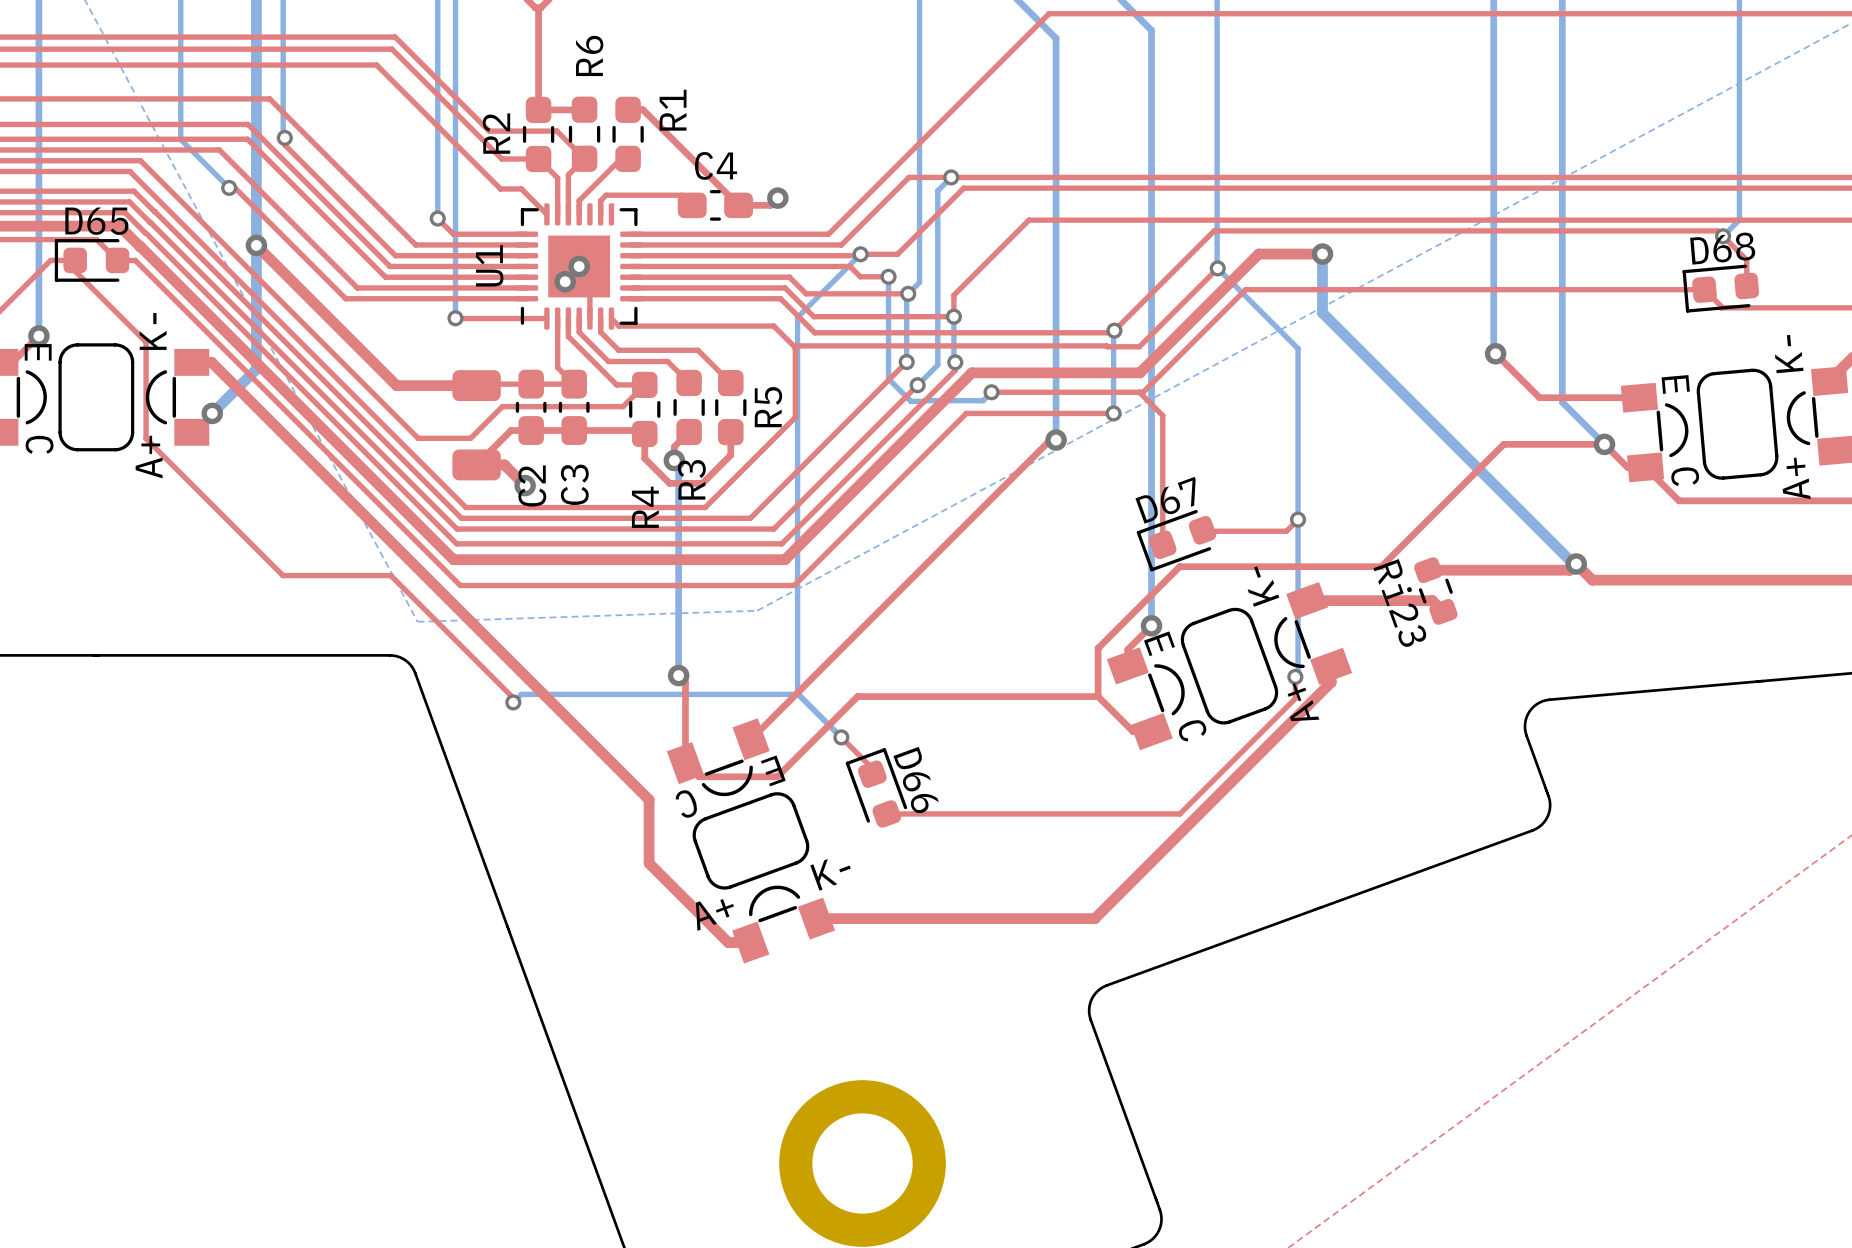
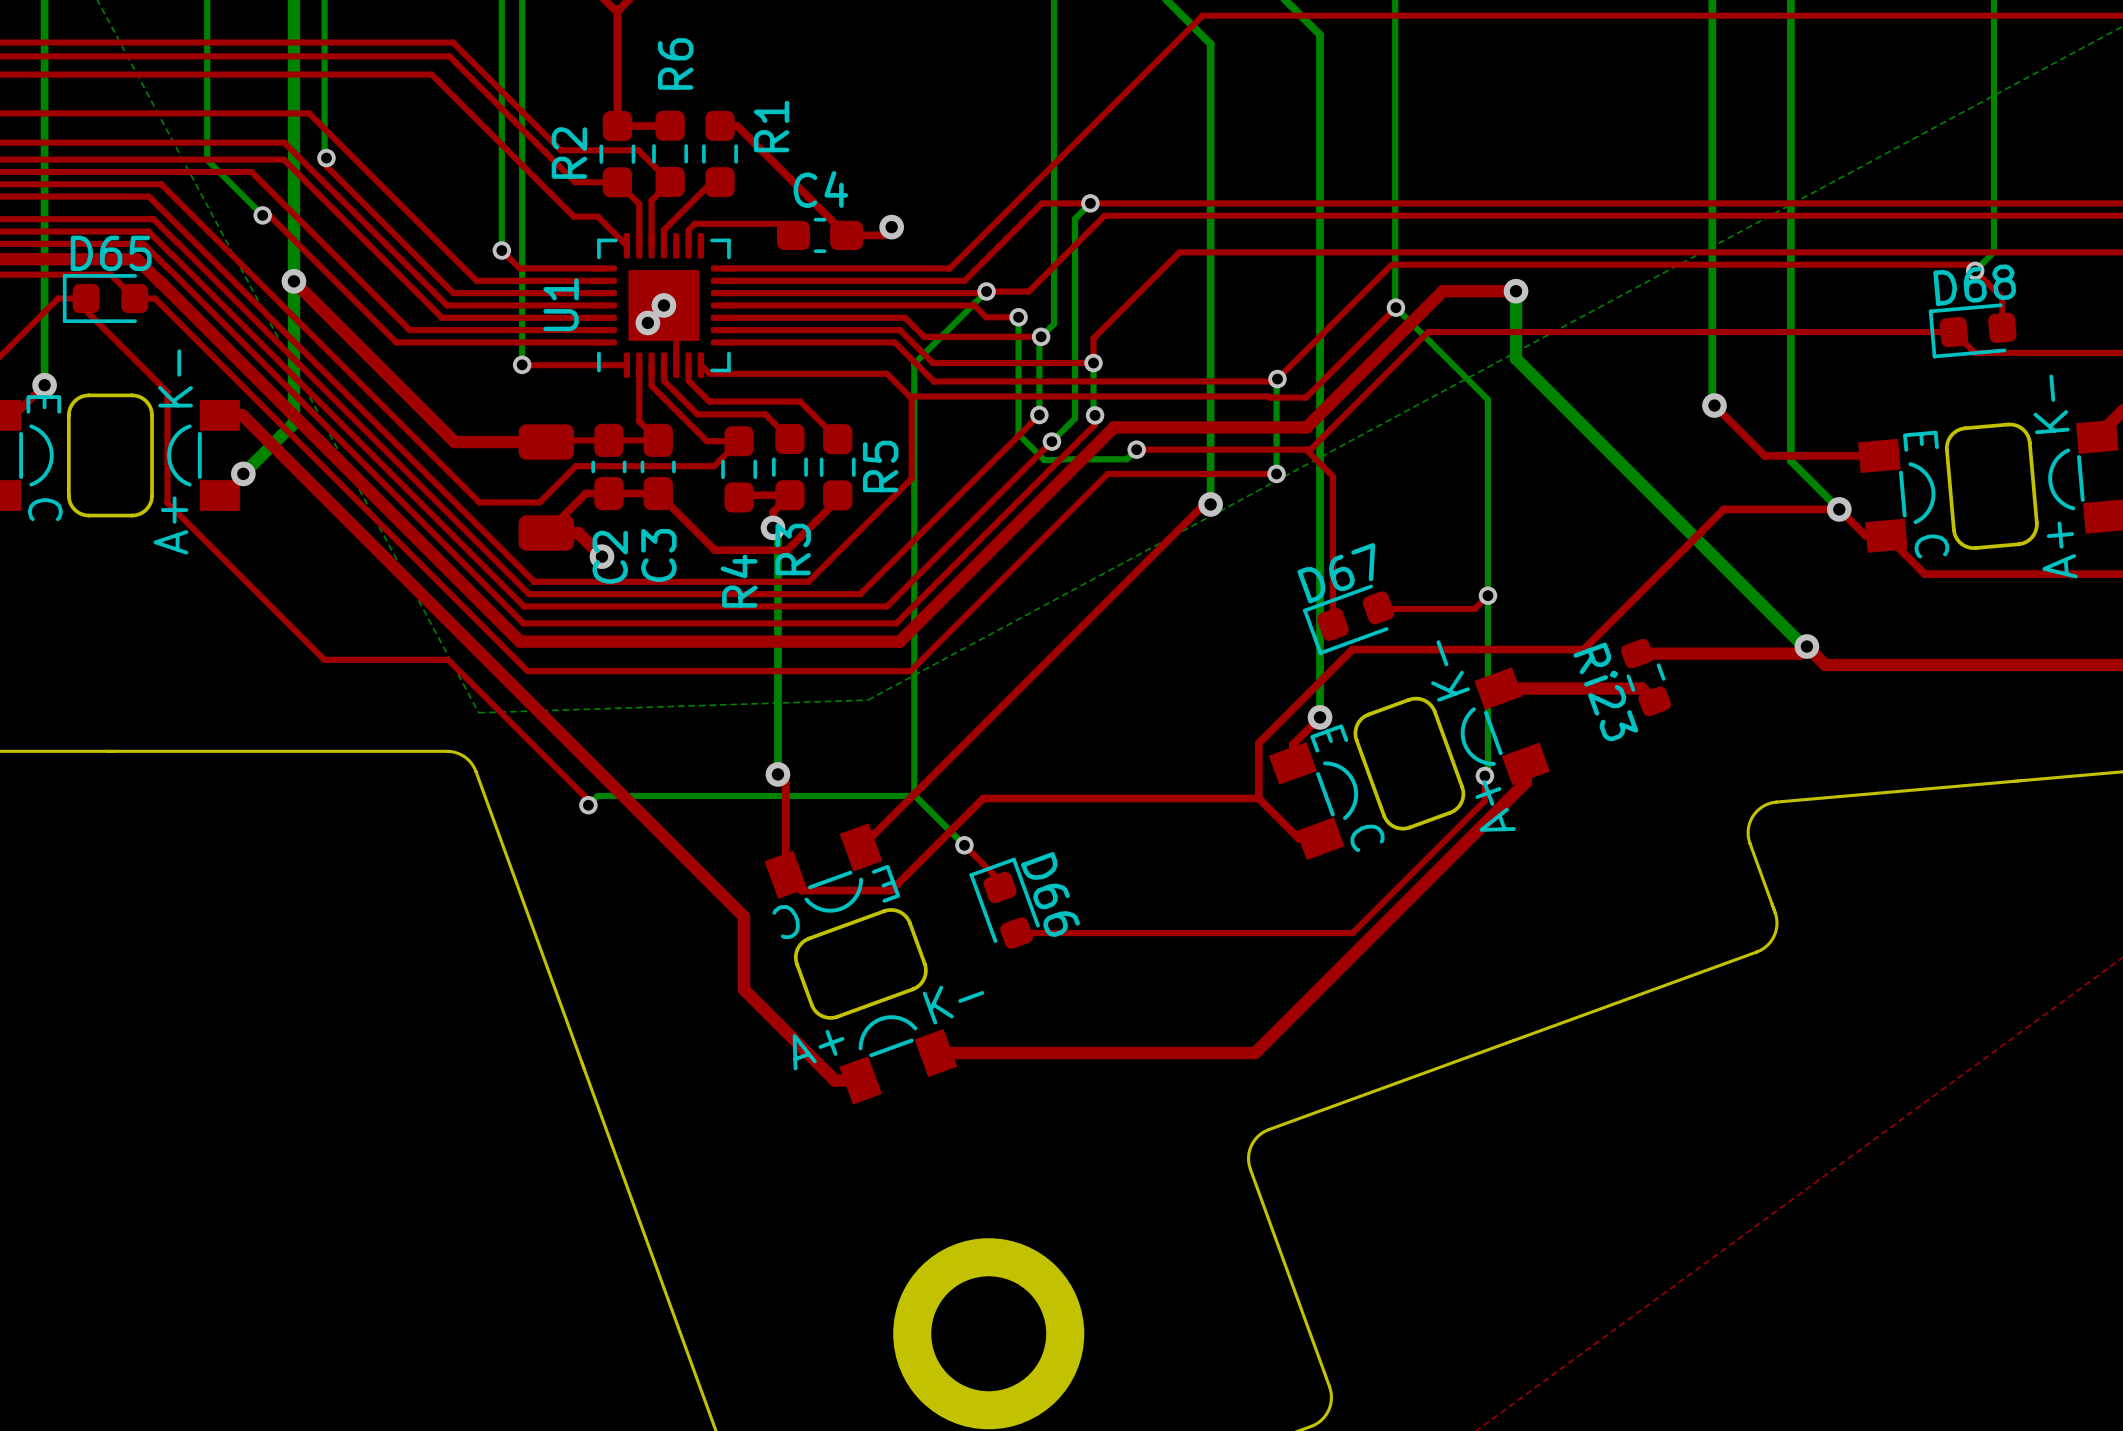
top track: (574, 430) (641, 430) (644, 433) (644, 458) (669, 483) (702, 483) (730, 455) (730, 435) -> (658, 493) (714, 550) (787, 550) (837, 499)
top track: none -> (741, 495) (789, 495)

